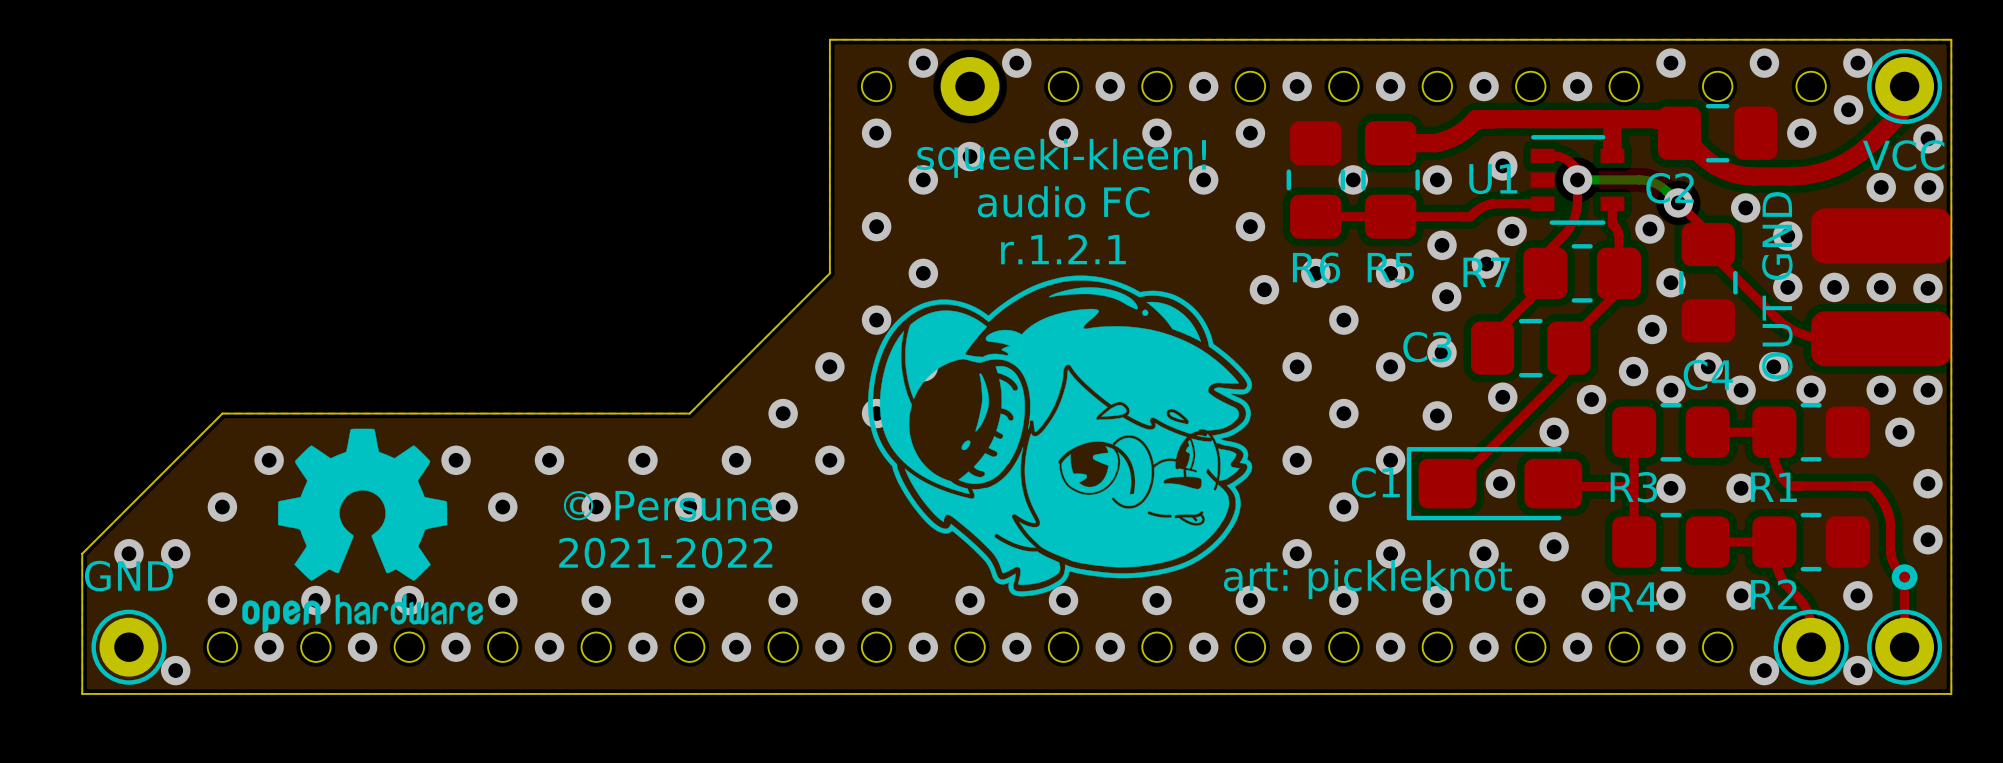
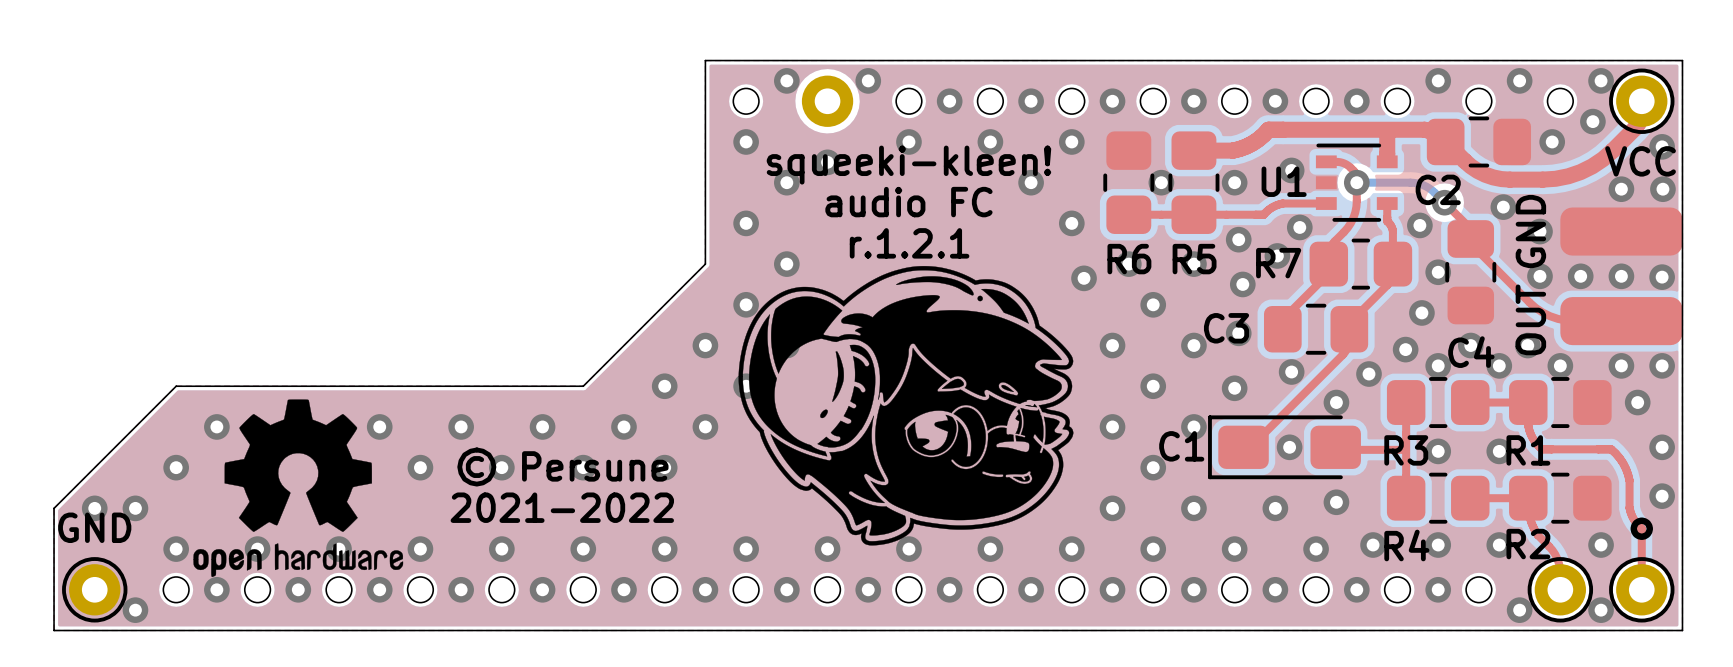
text: art: pickleknot (1367, 579) -> none

